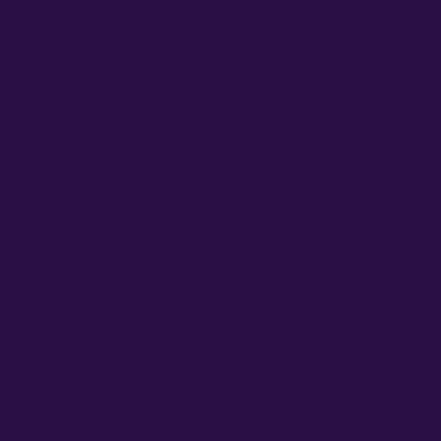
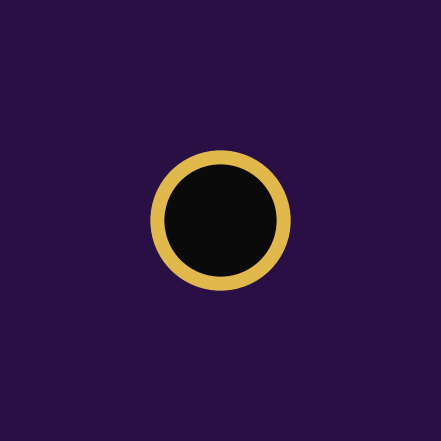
part: none -> (220, 220)

